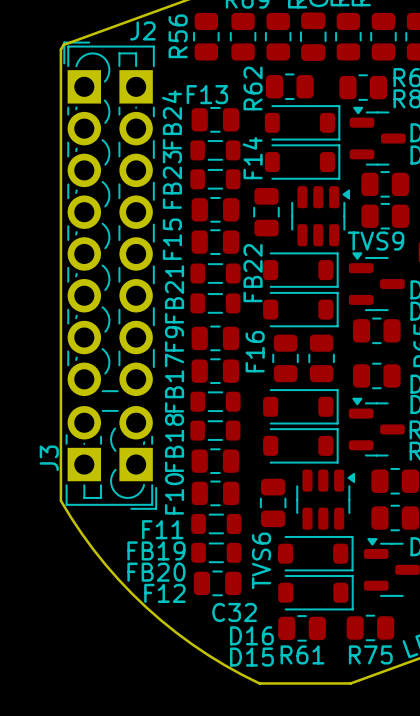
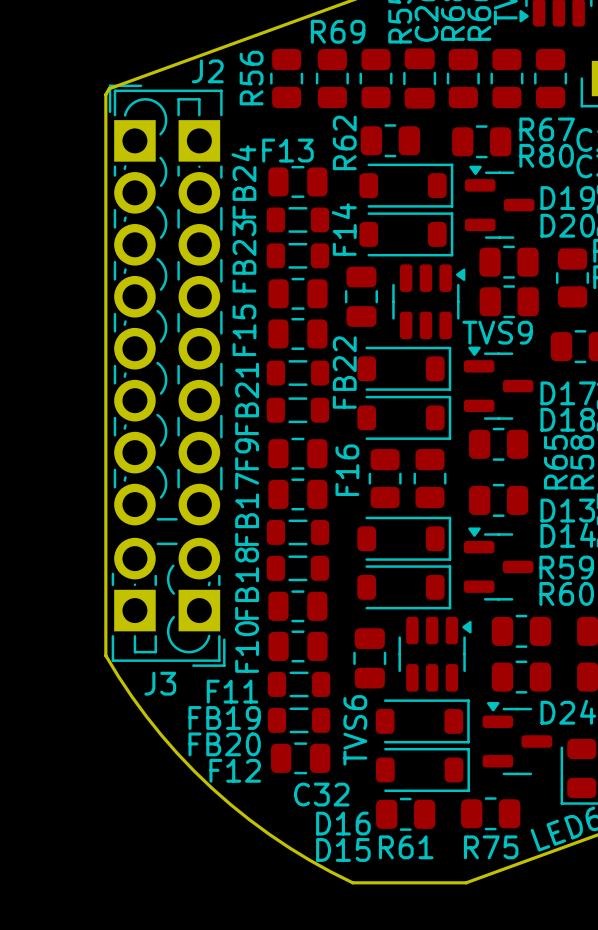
J3 name rotation: 0° (49, 458) -> 90° clockwise (160, 683)
J3 name position: J3 (49, 458) -> J3 (160, 683)

